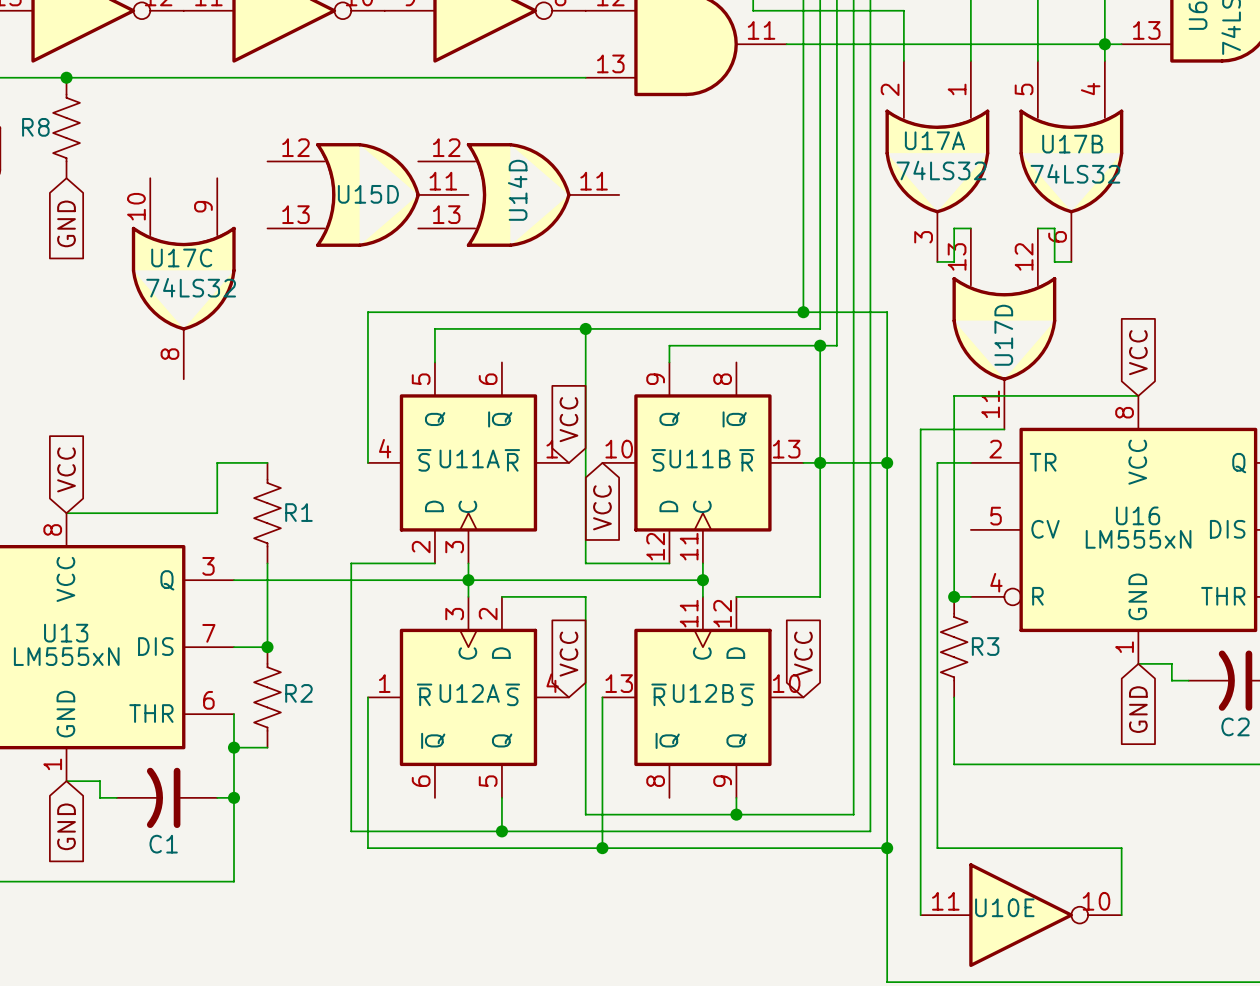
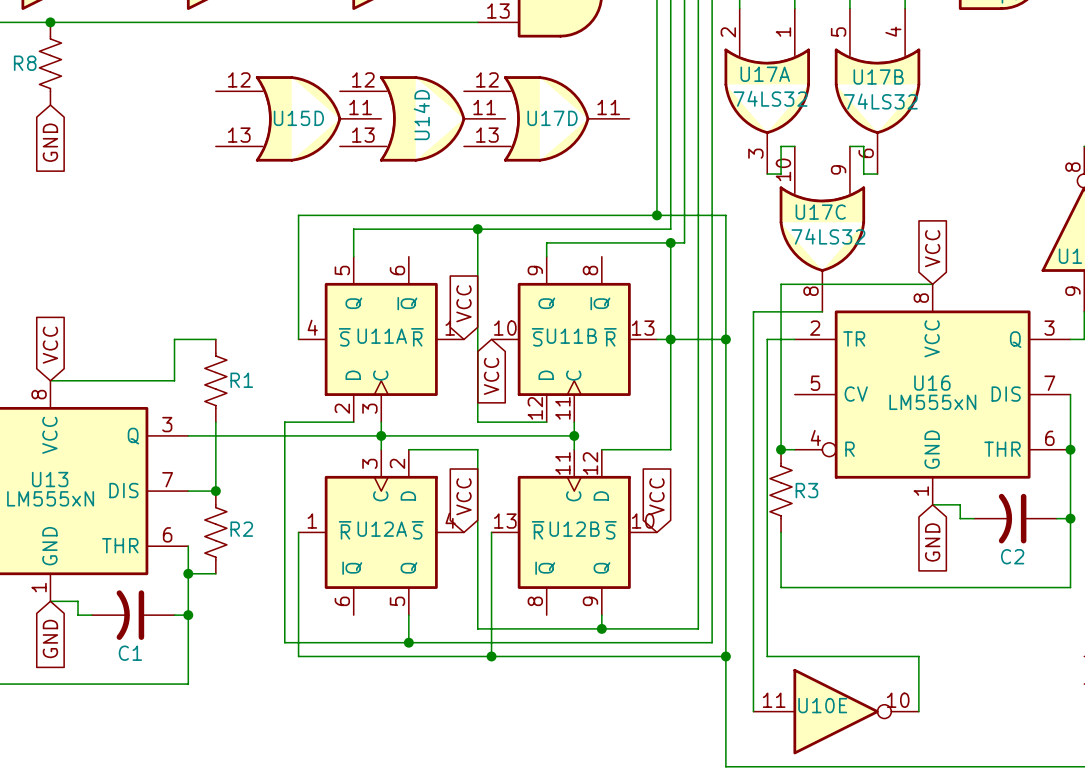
U17C position: (183, 278) -> (822, 229)
U17D rotation: 0° (1004, 328) -> 90° counterclockwise (546, 118)
U17D position: (1004, 328) -> (546, 118)

